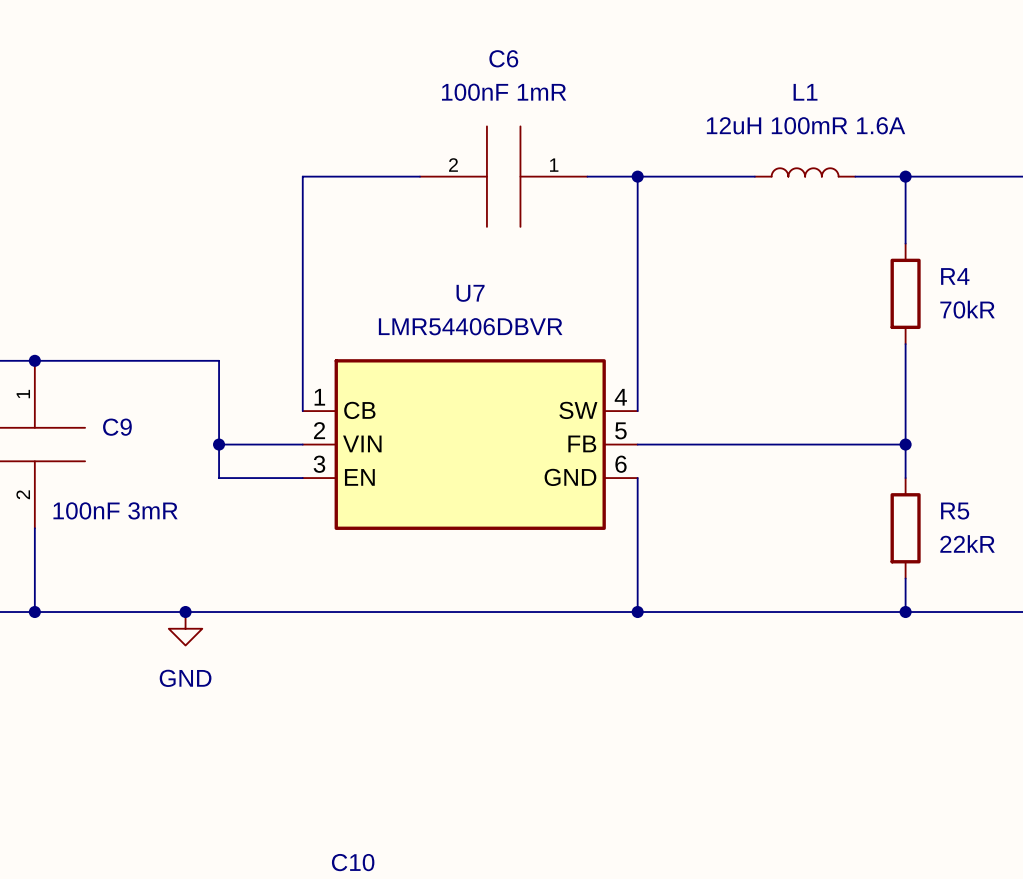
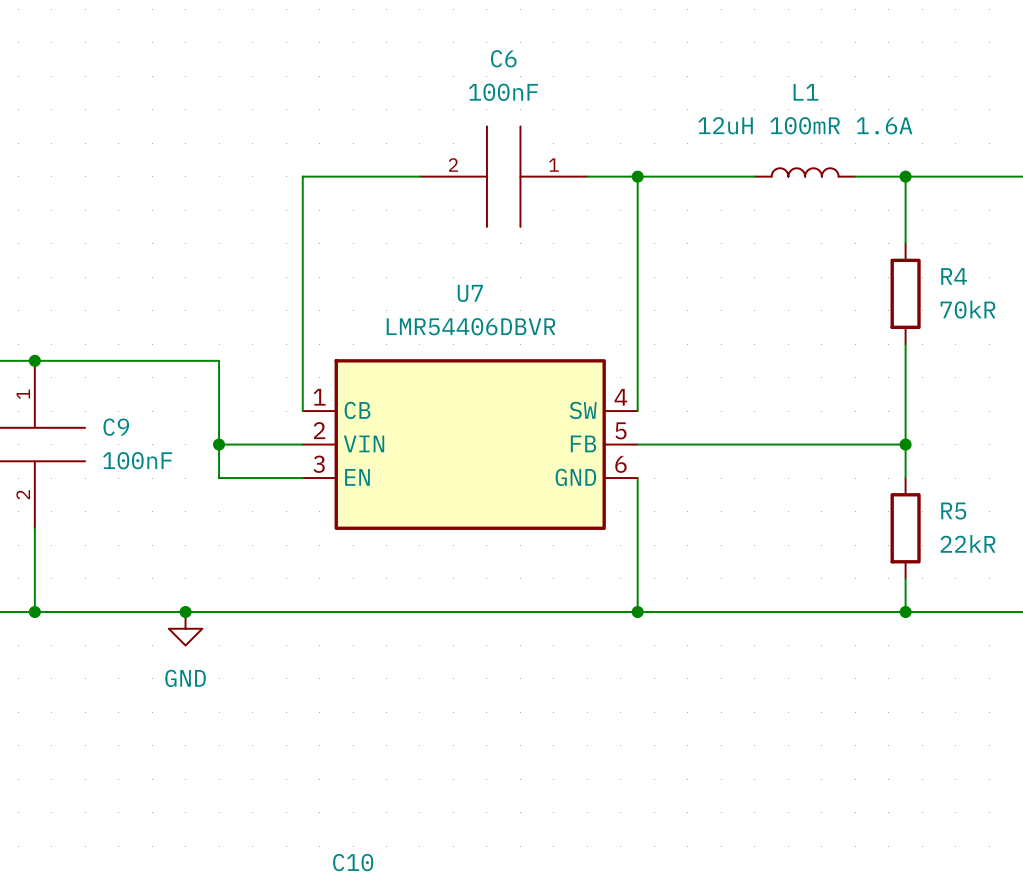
C6 value: 100nF 1mR (504, 92) -> 100nF (503, 92)
C9 value: 100nF 3mR (115, 510) -> 100nF (137, 460)

